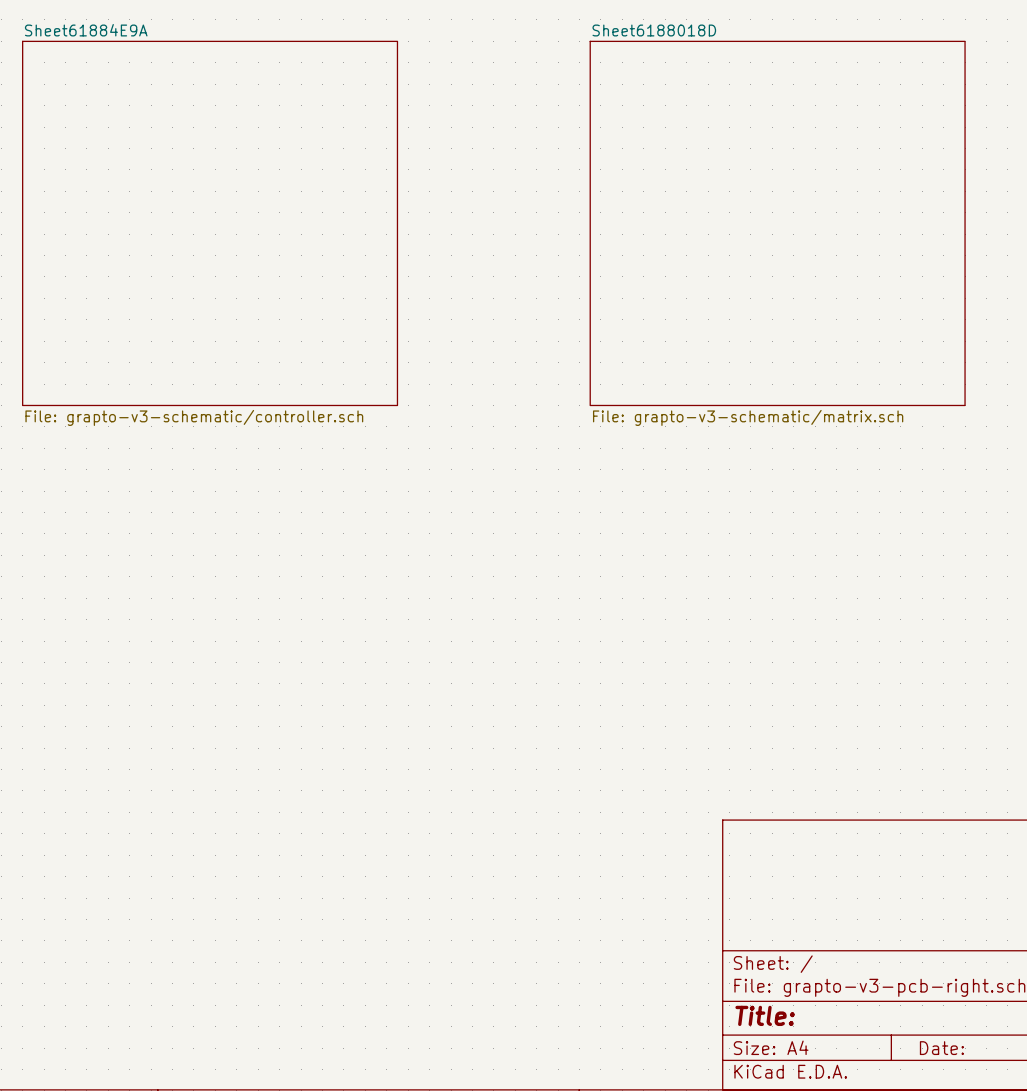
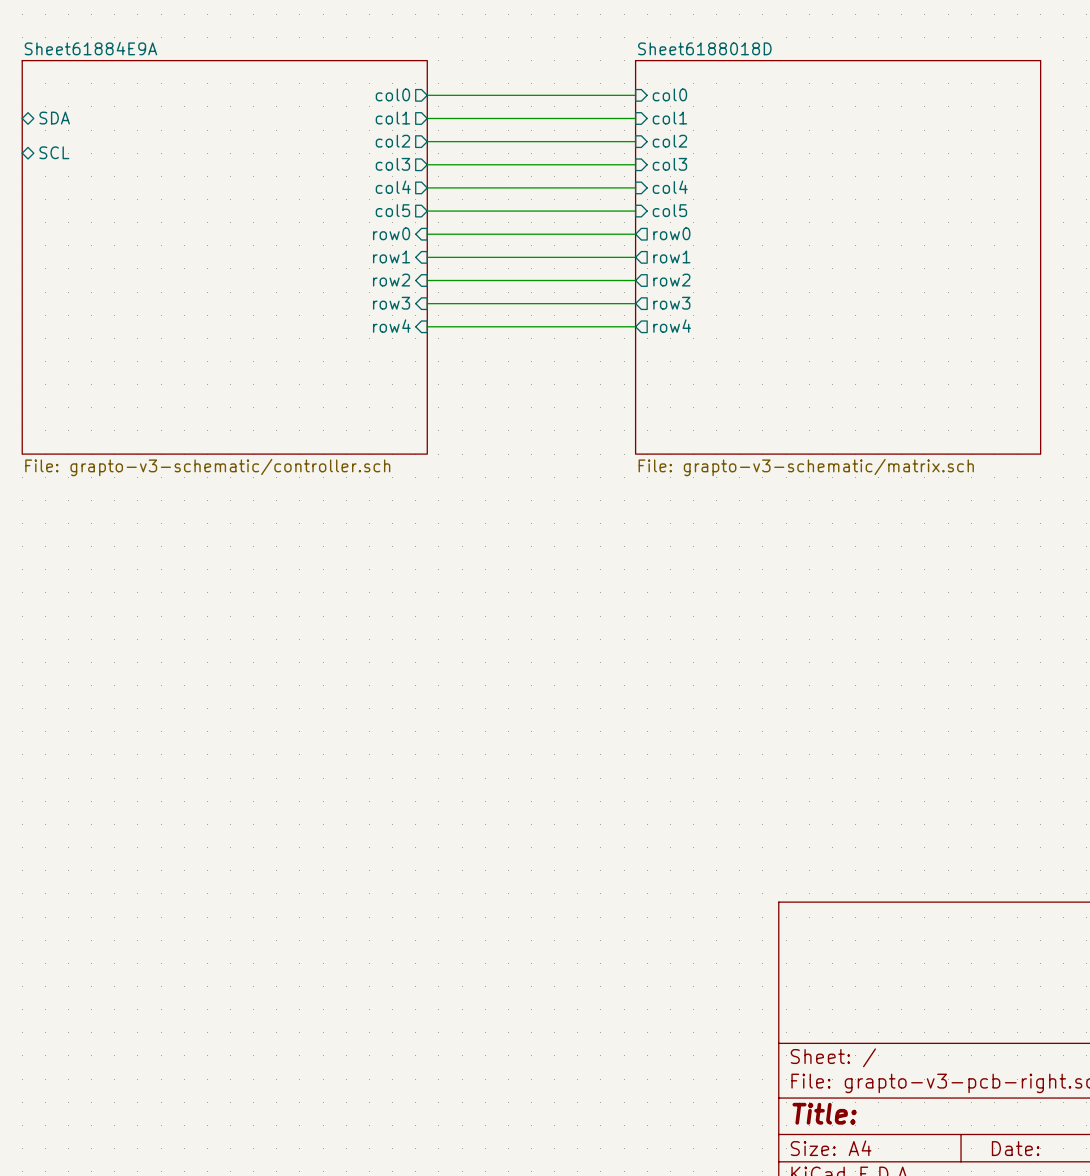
sheet pin: none -> col0 (392, 94)
wire: none -> (427, 95) (635, 95)
sheet pin: none -> col0 (669, 94)
sheet pin: none -> SDA (54, 118)
sheet pin: none -> col1 (392, 118)
wire: none -> (427, 118) (635, 118)
sheet pin: none -> col1 (669, 118)
sheet pin: none -> col2 (392, 141)
sheet pin: none -> col2 (669, 141)
wire: none -> (427, 141) (635, 141)
sheet pin: none -> SCL (54, 152)
sheet pin: none -> col3 (392, 164)
wire: none -> (427, 164) (635, 164)
sheet pin: none -> col3 (669, 164)
sheet pin: none -> col4 (393, 187)
sheet pin: none -> col4 (670, 187)
wire: none -> (427, 187) (635, 187)
sheet pin: none -> col5 (392, 210)
wire: none -> (427, 211) (635, 211)
sheet pin: none -> col5 (669, 210)
sheet pin: none -> row0 (391, 233)
sheet pin: none -> row0 (671, 233)
wire: none -> (427, 234) (635, 234)
sheet pin: none -> row1 (391, 256)
wire: none -> (427, 257) (635, 257)
sheet pin: none -> row1 (671, 256)
sheet pin: none -> row2 (391, 280)
wire: none -> (427, 280) (635, 280)
sheet pin: none -> row2 (671, 280)
sheet pin: none -> row3 (391, 303)
sheet pin: none -> row3 (671, 303)
wire: none -> (427, 303) (635, 303)
sheet pin: none -> row4 (391, 326)
wire: none -> (427, 326) (635, 326)
sheet pin: none -> row4 (672, 326)

